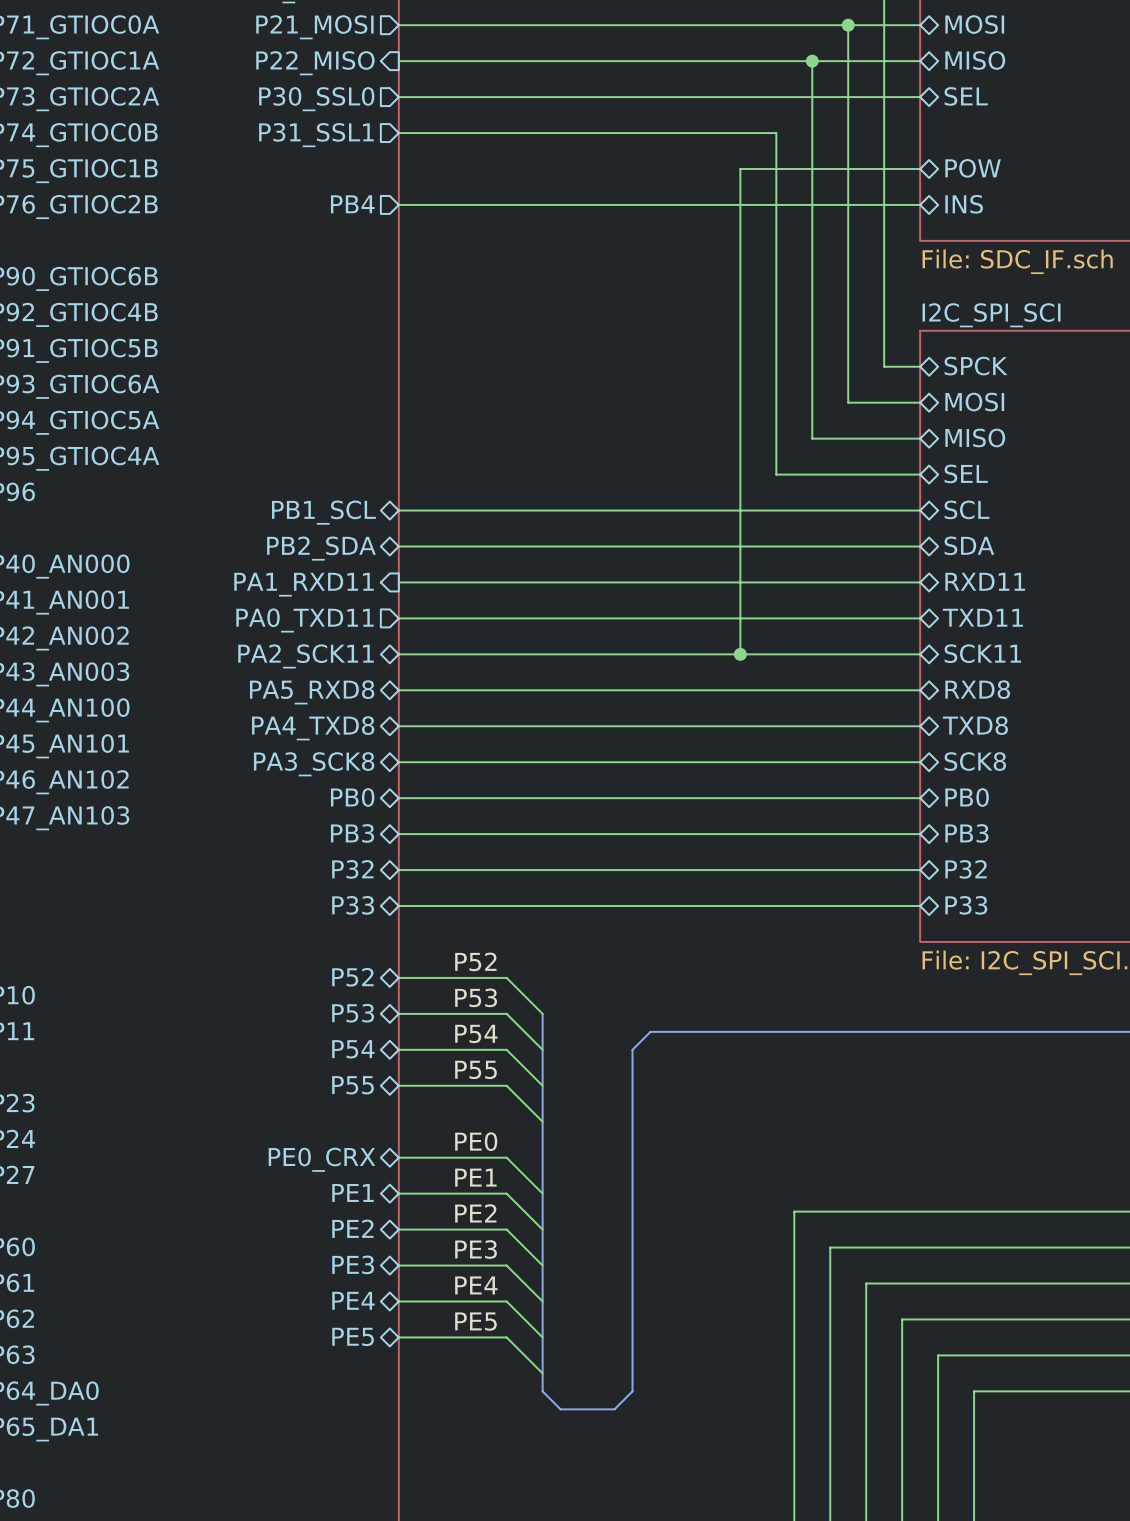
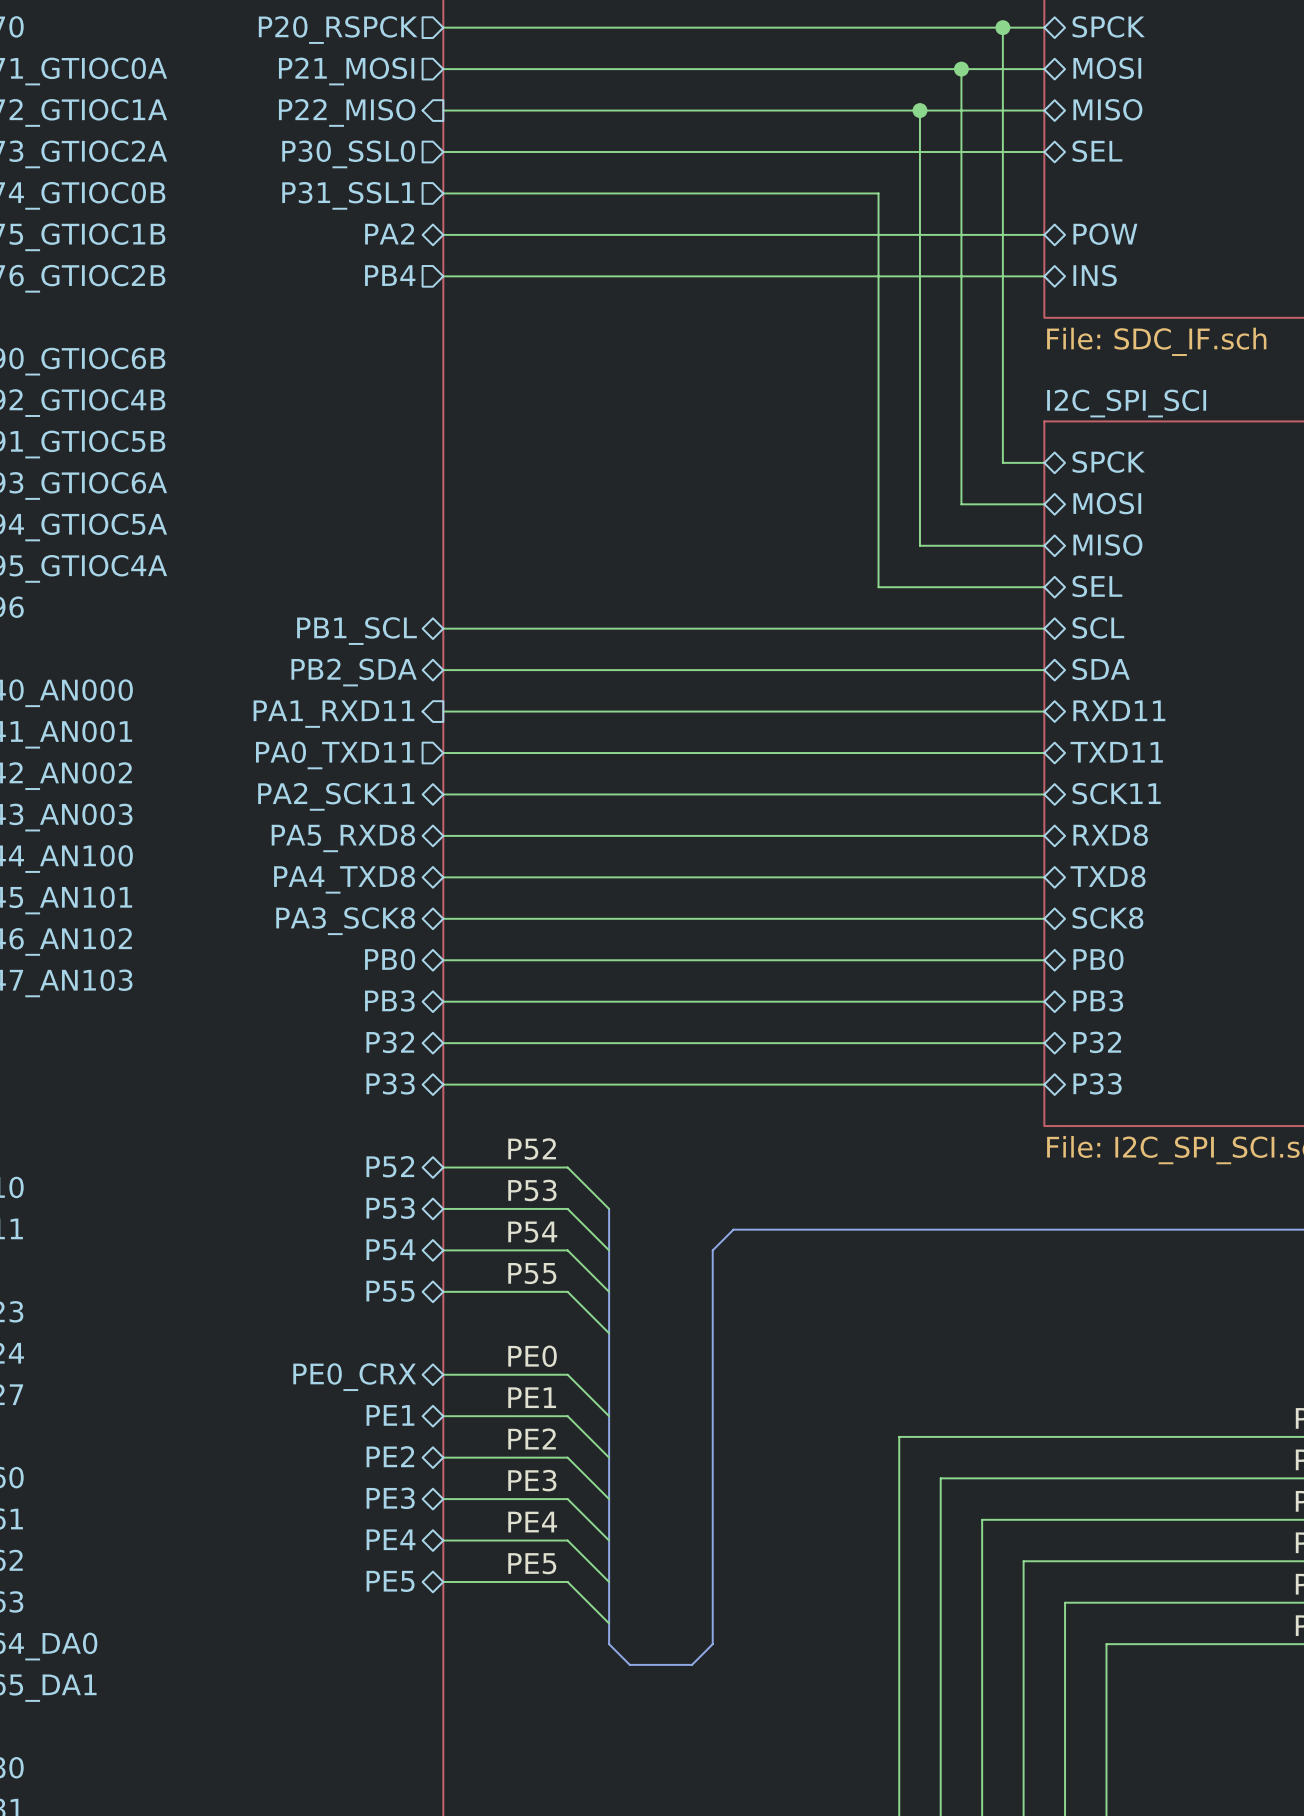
sheet pin: none -> PA2 (389, 233)
wire: (740, 169) (740, 654) -> (837, 234) (443, 234)
junction: (740, 654) -> none

